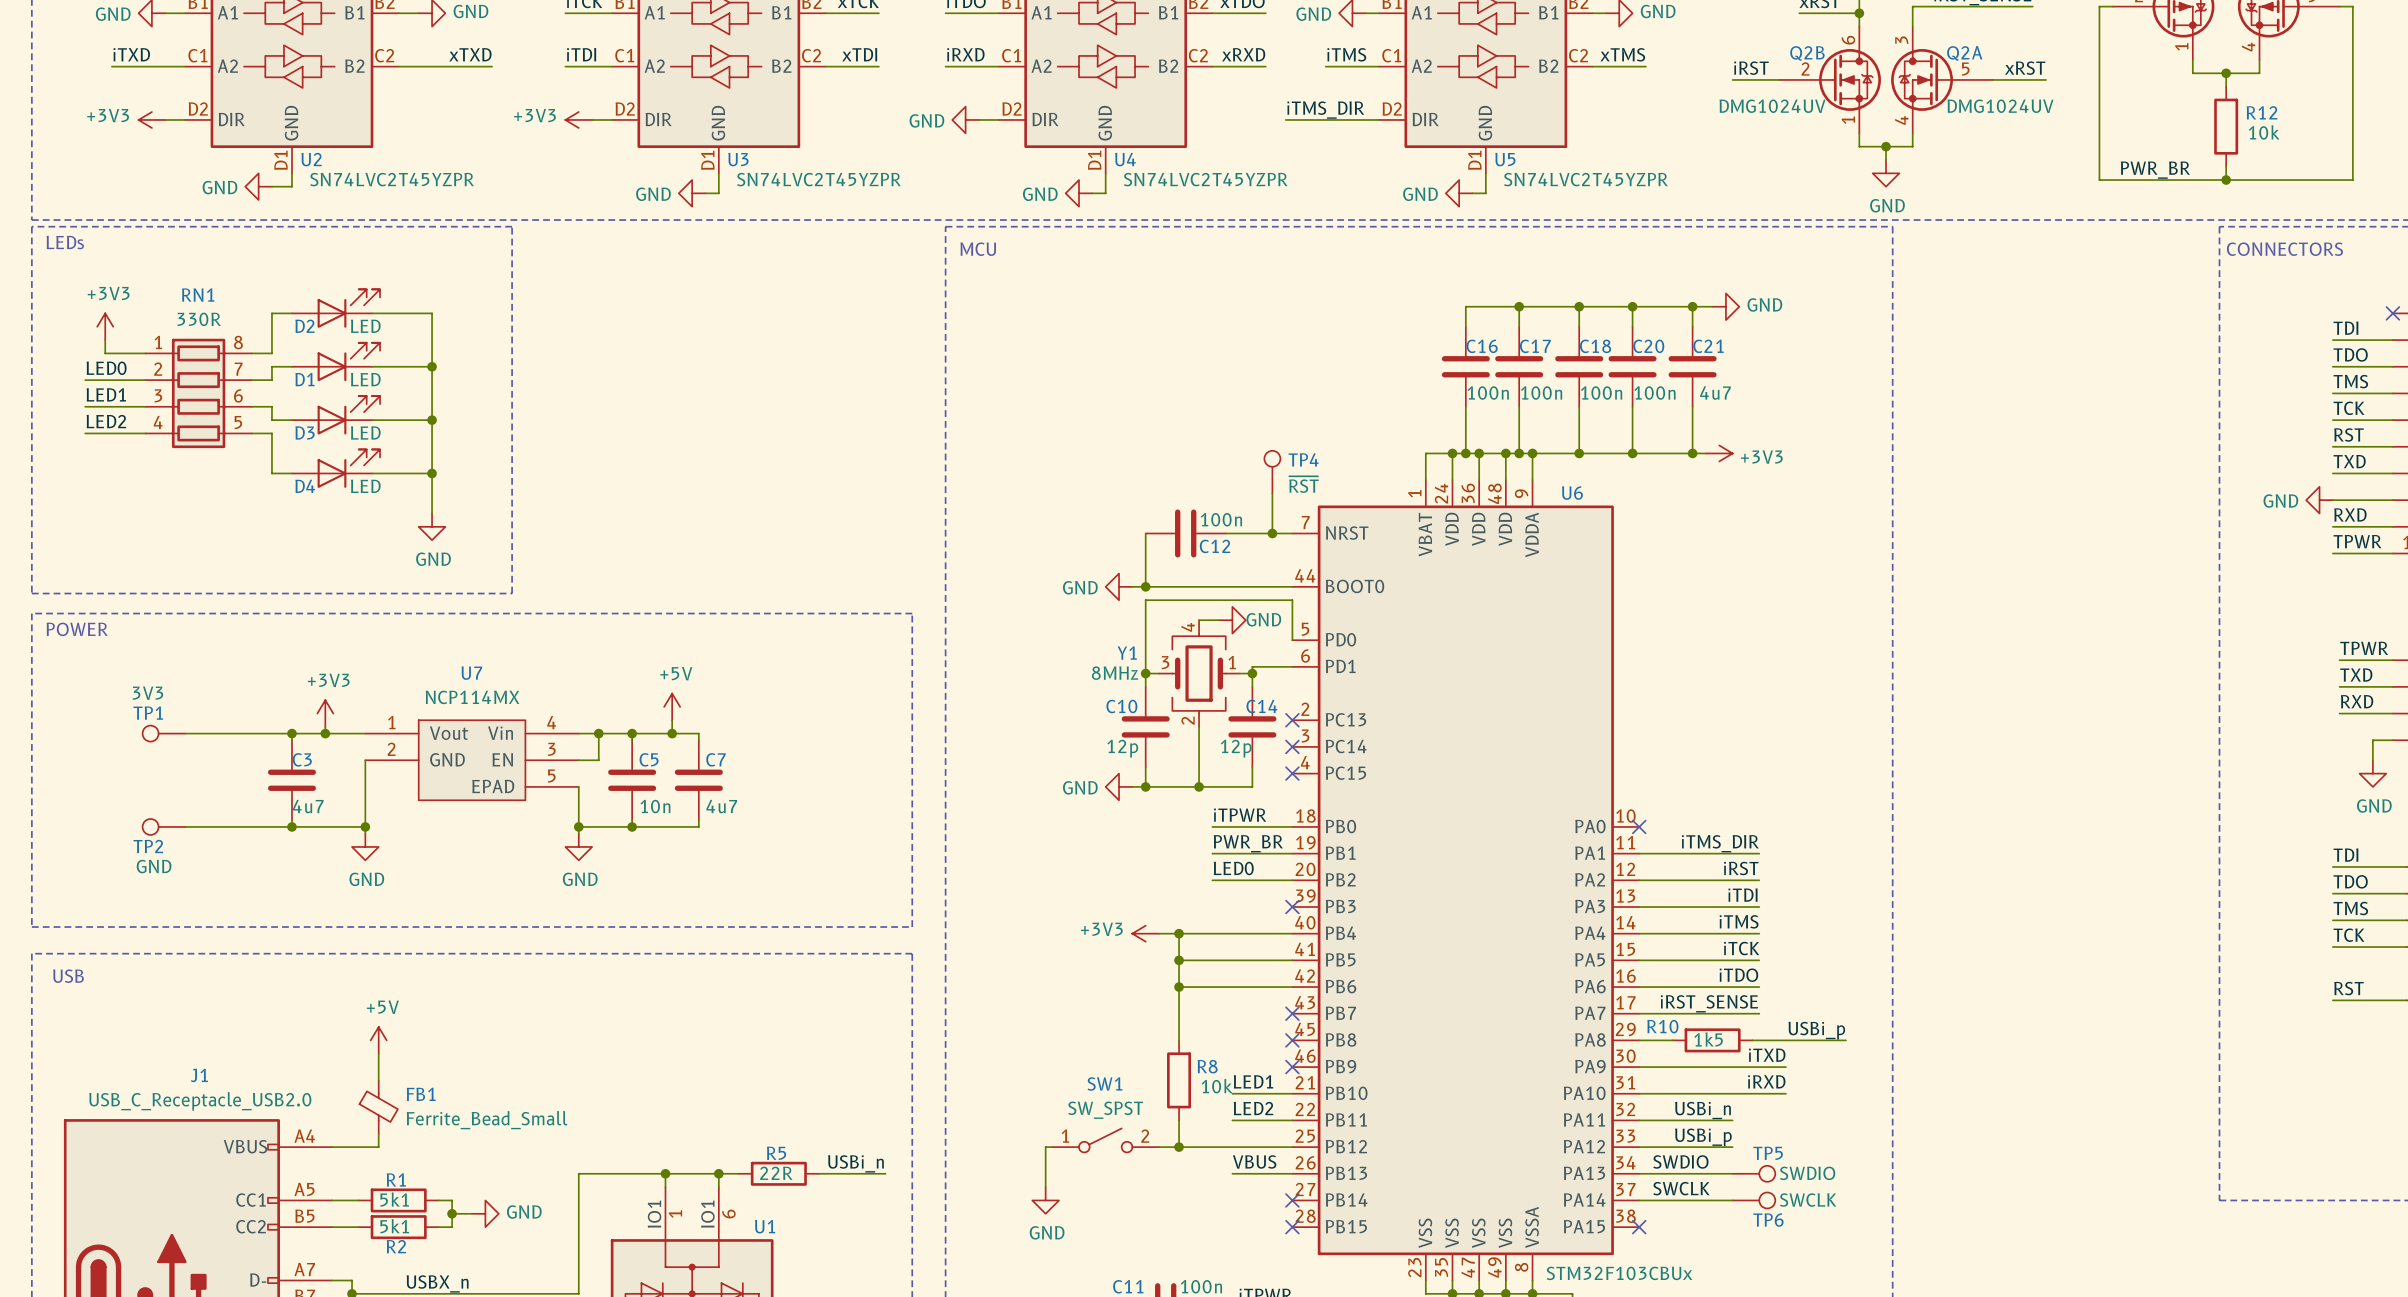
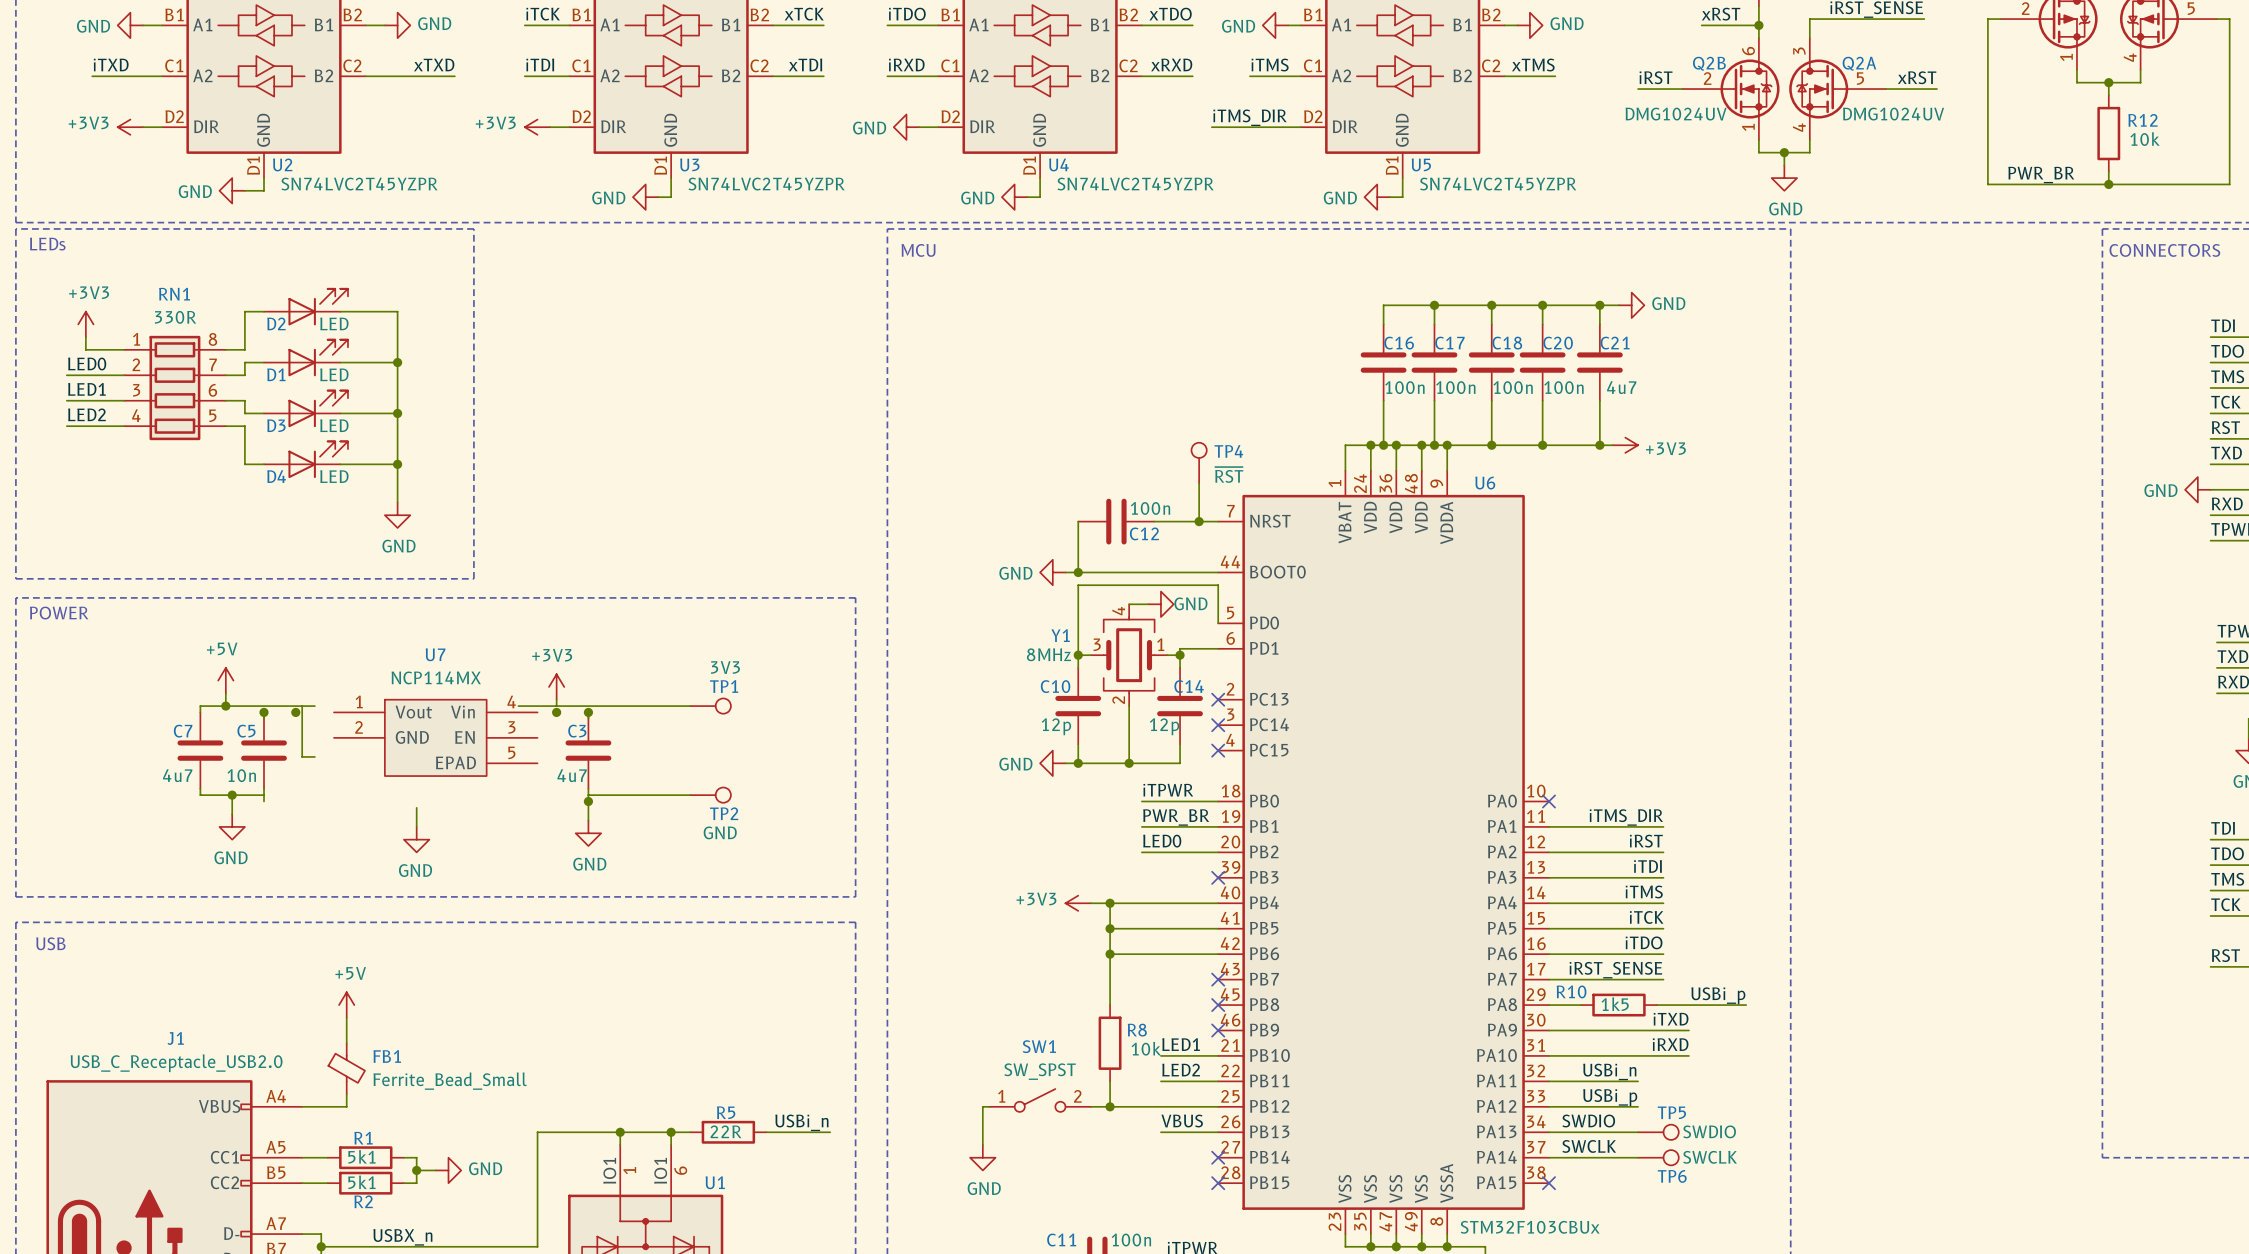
TP1 value position: 3V3 (147, 693) -> 3V3 (725, 667)
power symbol: none -> +5V (225, 680)
power symbol: none -> +3V3 (556, 686)
power symbol: +5V (672, 706) -> none
TP1 name position: TP1 (148, 713) -> TP1 (724, 686)
wire: none -> (225, 693) (225, 706)
power symbol: +3V3 (325, 713) -> none
wire: none -> (556, 699) (556, 706)
wire: (672, 720) (672, 733) -> none
junction: none -> (225, 706)
wire: none -> (302, 706) (302, 756) (314, 756)
wire: none -> (314, 706) (200, 706) (200, 712)
wire: none -> (518, 706) (690, 706)
TP1 rotation: 0° (150, 733) -> 180° (723, 706)
TP1 position: (163, 733) -> (710, 706)
wire: (185, 733) (365, 733) -> none
wire: (578, 733) (698, 733) (698, 740) -> none
wire: (598, 733) (598, 760) (578, 760) -> none
junction: (672, 733) -> none
C3 name position: C3 (302, 759) -> C3 (577, 731)
C5 name position: C5 (649, 759) -> C5 (246, 731)
C7 name position: C7 (715, 759) -> C7 (183, 731)
wire: (365, 760) (365, 833) -> none
C3 position: (291, 780) -> (588, 750)
C5 position: (632, 780) -> (264, 750)
C7 position: (698, 780) -> (200, 750)
wire: (578, 786) (578, 833) -> none
C3 value position: 4u7 (308, 806) -> 4u7 (572, 775)
C5 value position: 10n (655, 806) -> 10n (241, 775)
C7 value position: 4u7 (721, 806) -> 4u7 (177, 775)
wire: none -> (200, 788) (200, 795) (264, 795) (264, 788)
wire: none -> (588, 788) (588, 795) (690, 795)
wire: none -> (232, 795) (232, 814)
wire: (698, 820) (698, 826) (578, 826) -> none
TP2 rotation: 0° (150, 826) -> 180° (723, 795)
TP2 position: (163, 826) -> (710, 795)
wire: (185, 826) (365, 826) -> none
junction position: (291, 826) -> (232, 795)
junction: (365, 826) -> none
junction: (578, 826) -> none
wire: none -> (588, 801) (588, 820)
wire: none -> (416, 807) (416, 826)
TP2 name position: TP2 (148, 846) -> TP2 (724, 813)
power symbol: GND (365, 846) -> none
power symbol position: GND (578, 846) -> GND (588, 833)
power symbol: none -> GND (232, 826)
TP2 value position: GND (154, 866) -> GND (720, 832)
power symbol: none -> GND (416, 839)

